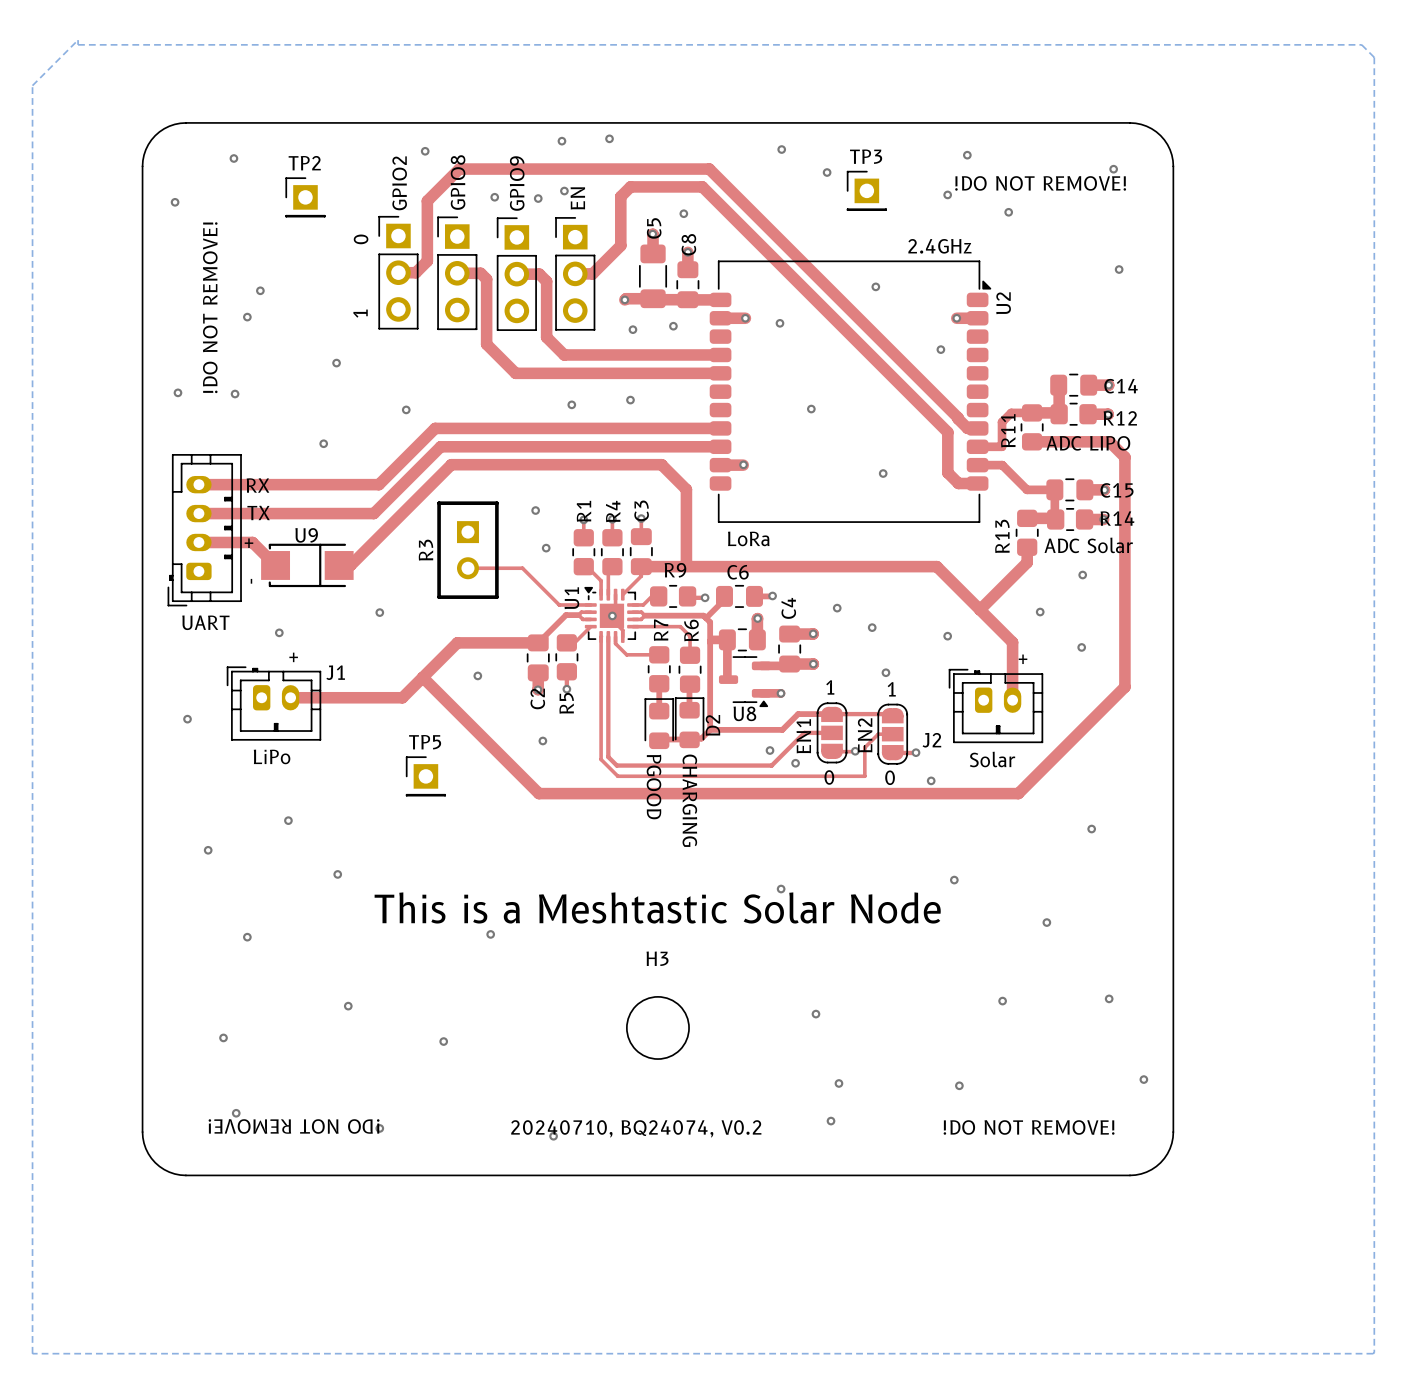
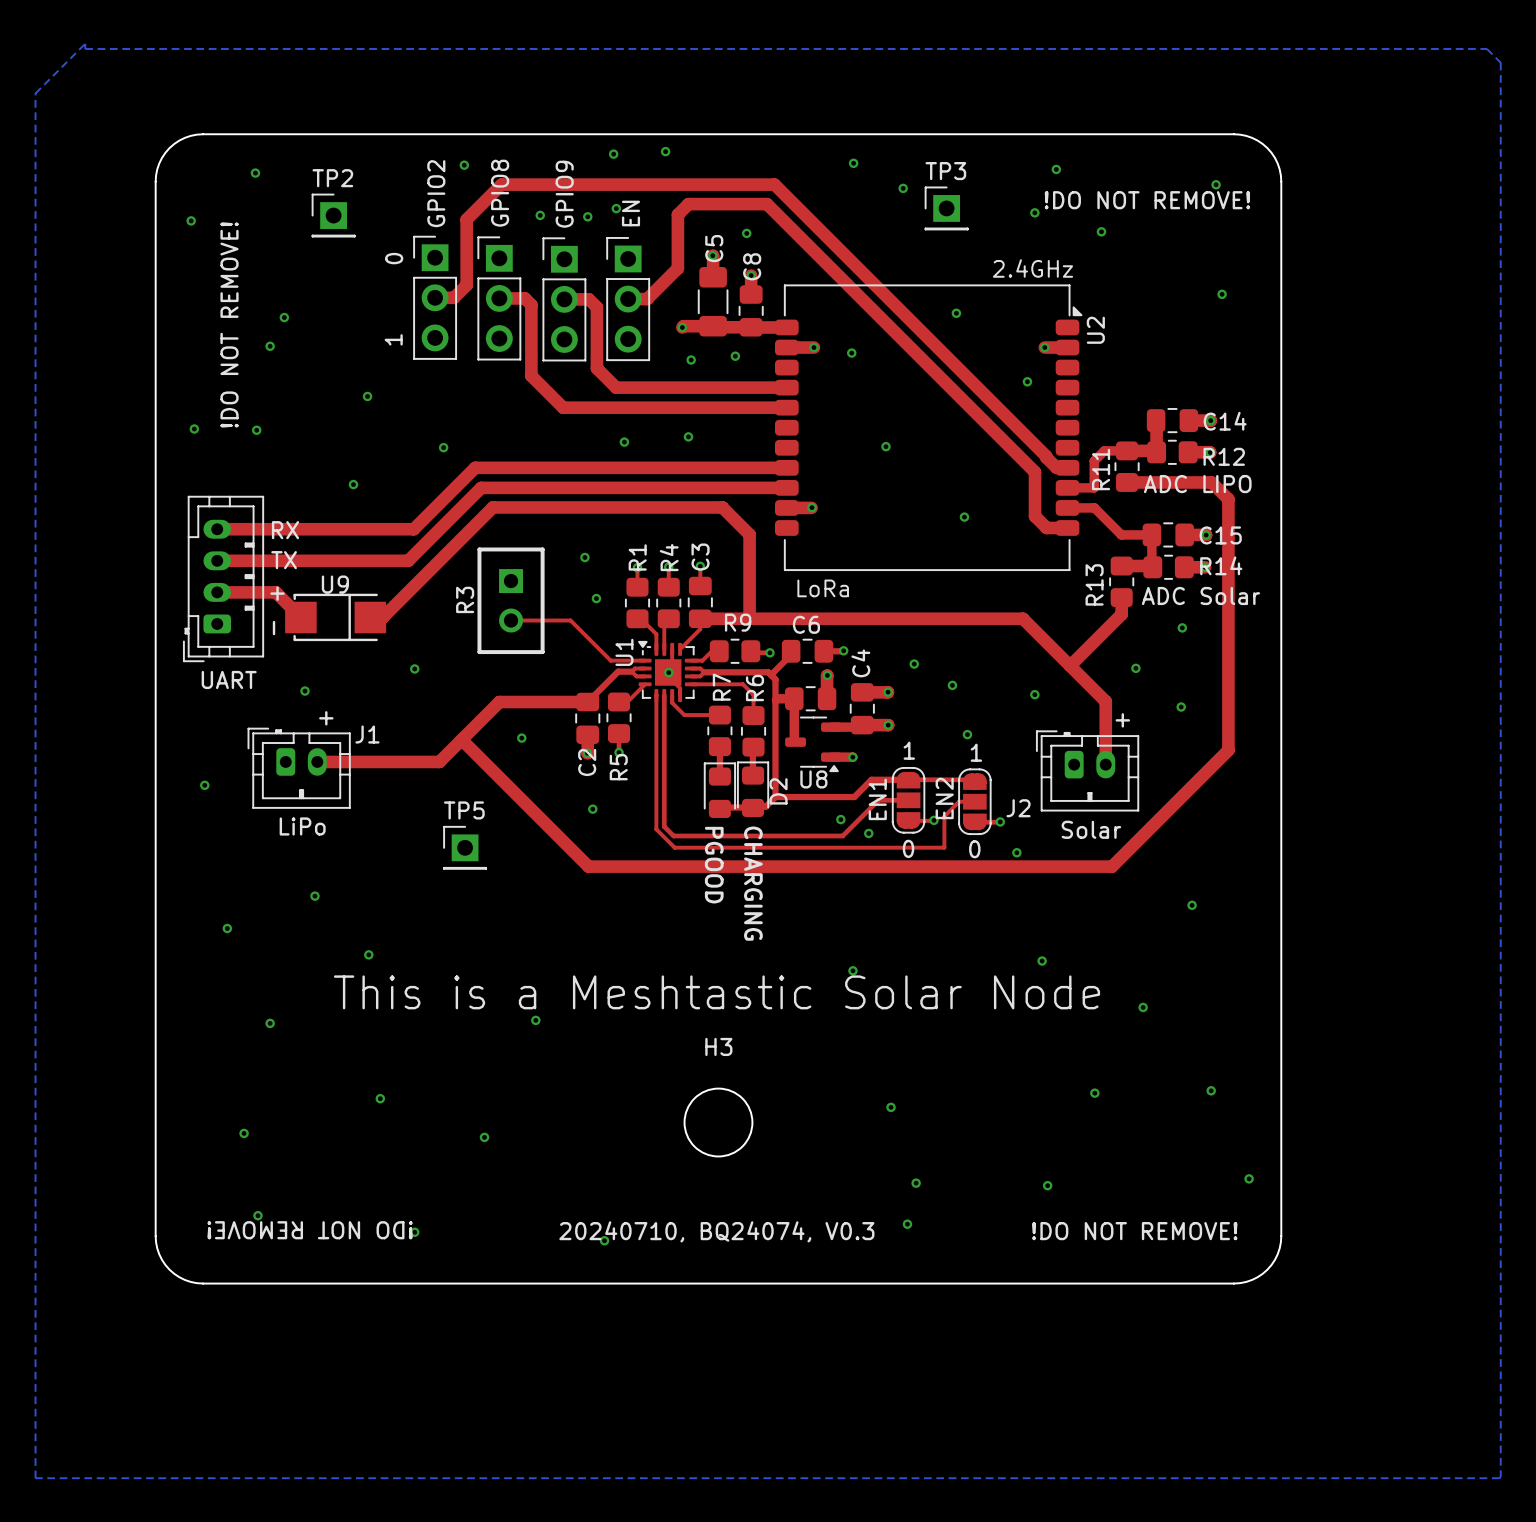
text: 20240710, BQ24074, V0.2 (636, 1128) -> 20240710, BQ24074, V0.3 (716, 1231)

